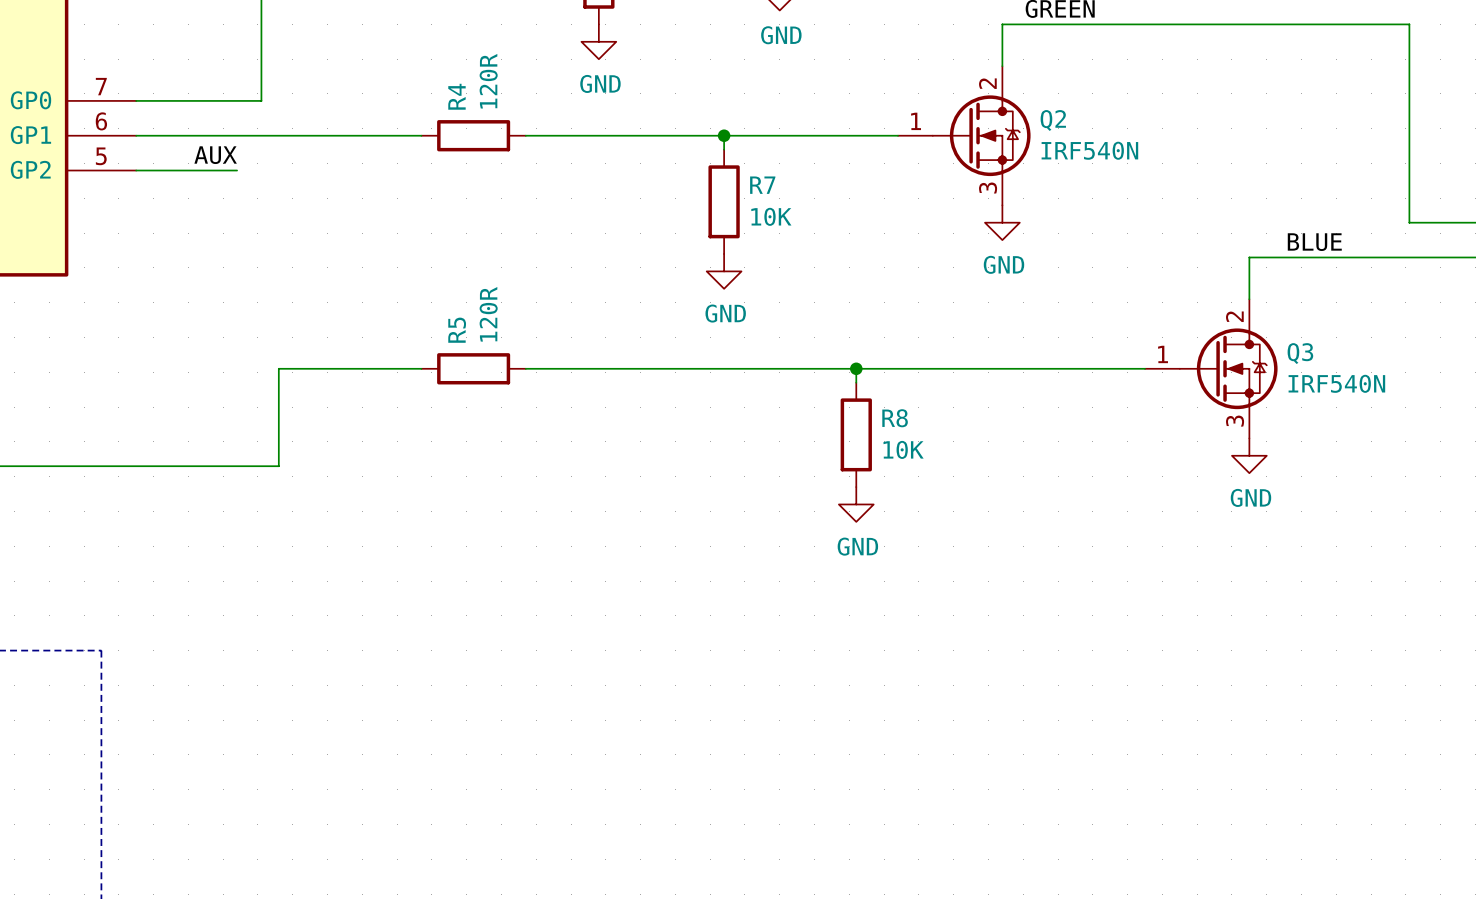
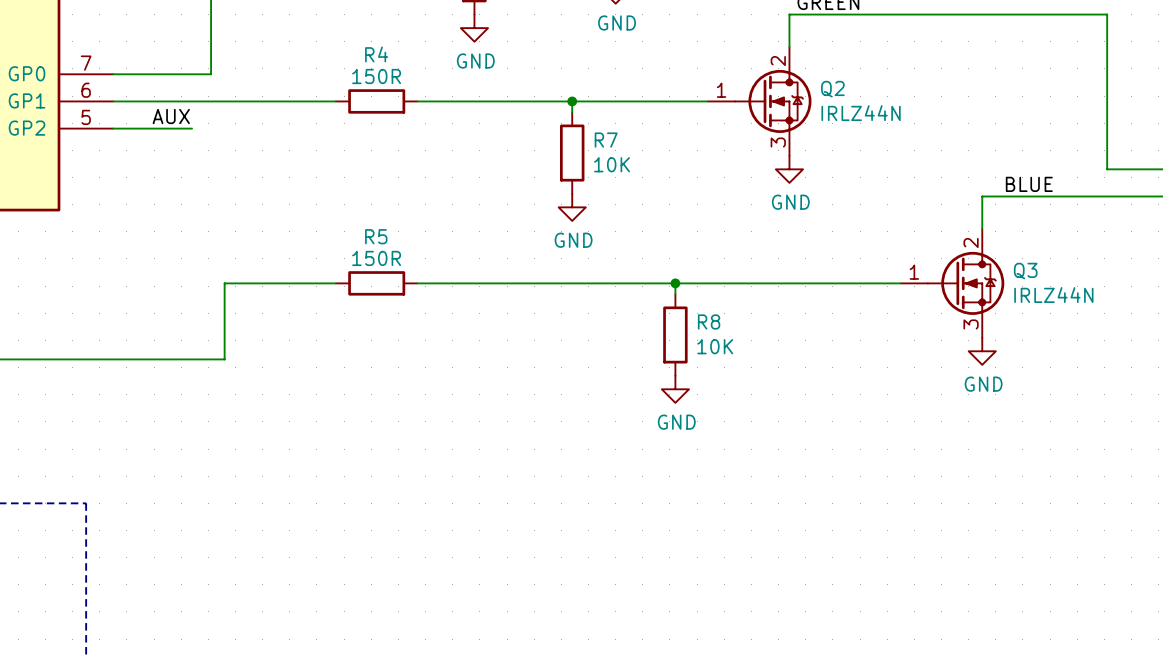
R4 value: 120R (488, 81) -> 150R (376, 76)
R4 name rotation: 0° (456, 96) -> 90° clockwise (376, 54)
Q2 value: IRF540N (1089, 150) -> IRLZ44N (861, 113)
R5 value: 120R (488, 314) -> 150R (376, 258)
R5 name rotation: 0° (457, 330) -> 90° clockwise (376, 236)
Q3 value: IRF540N (1336, 383) -> IRLZ44N (1053, 295)

